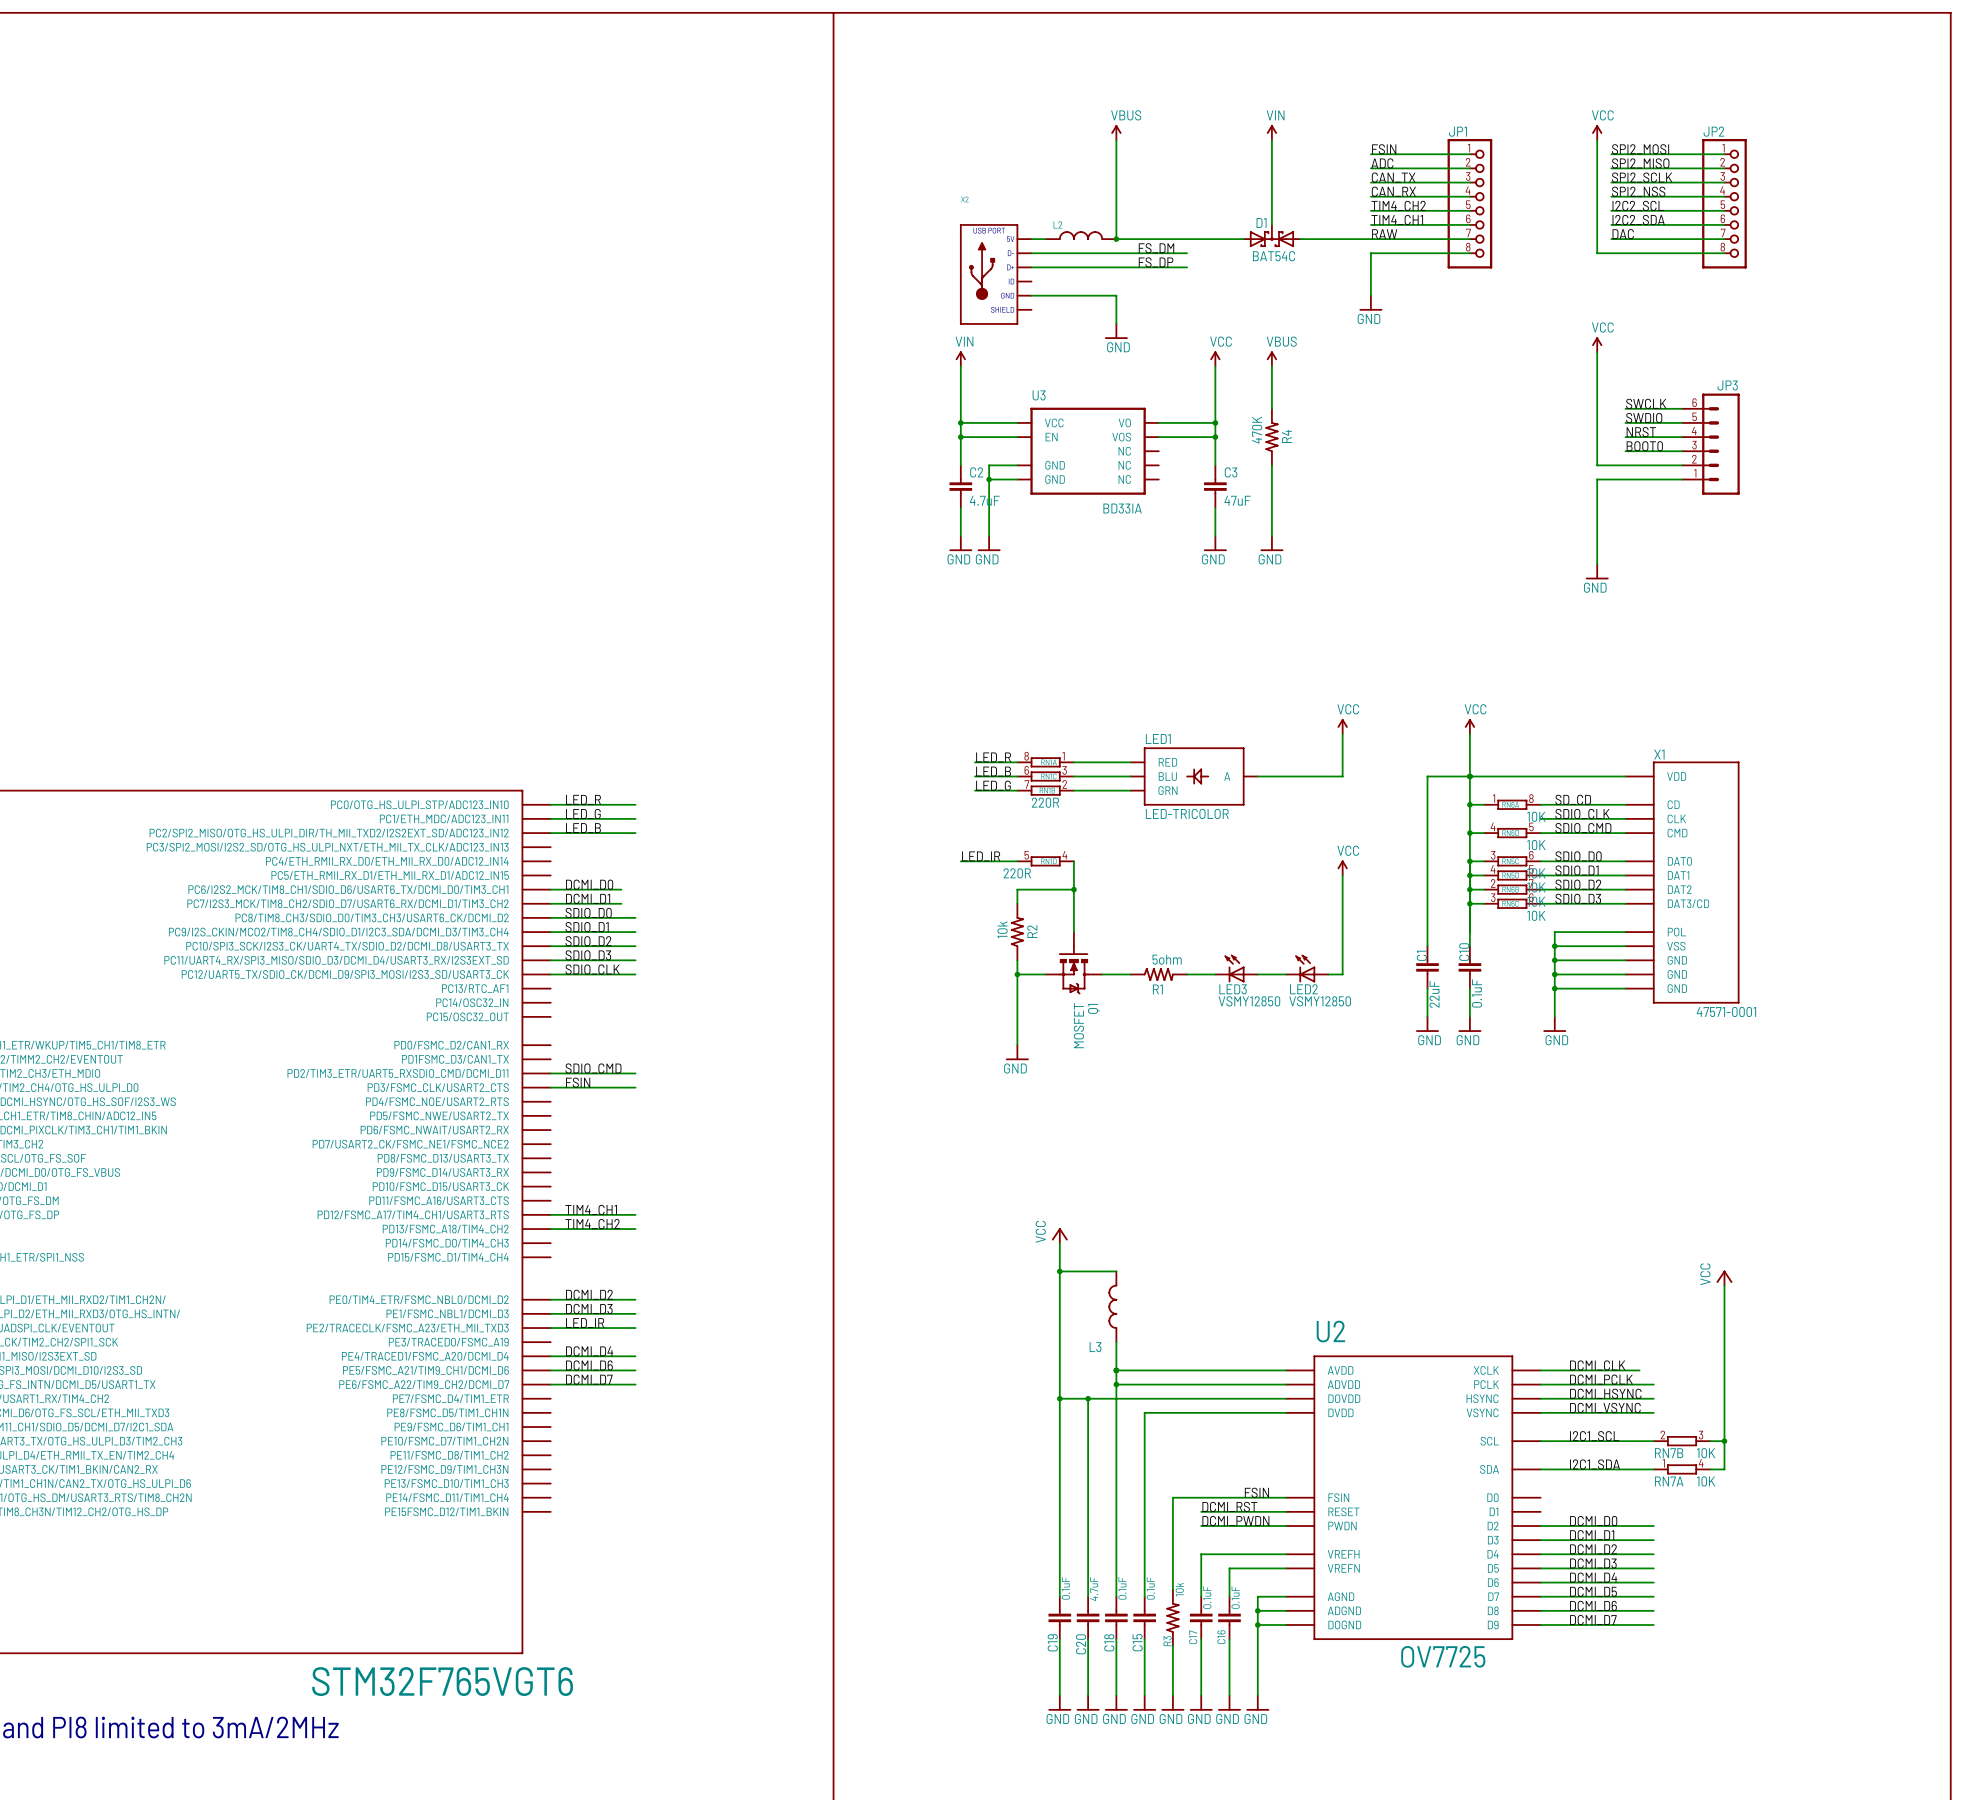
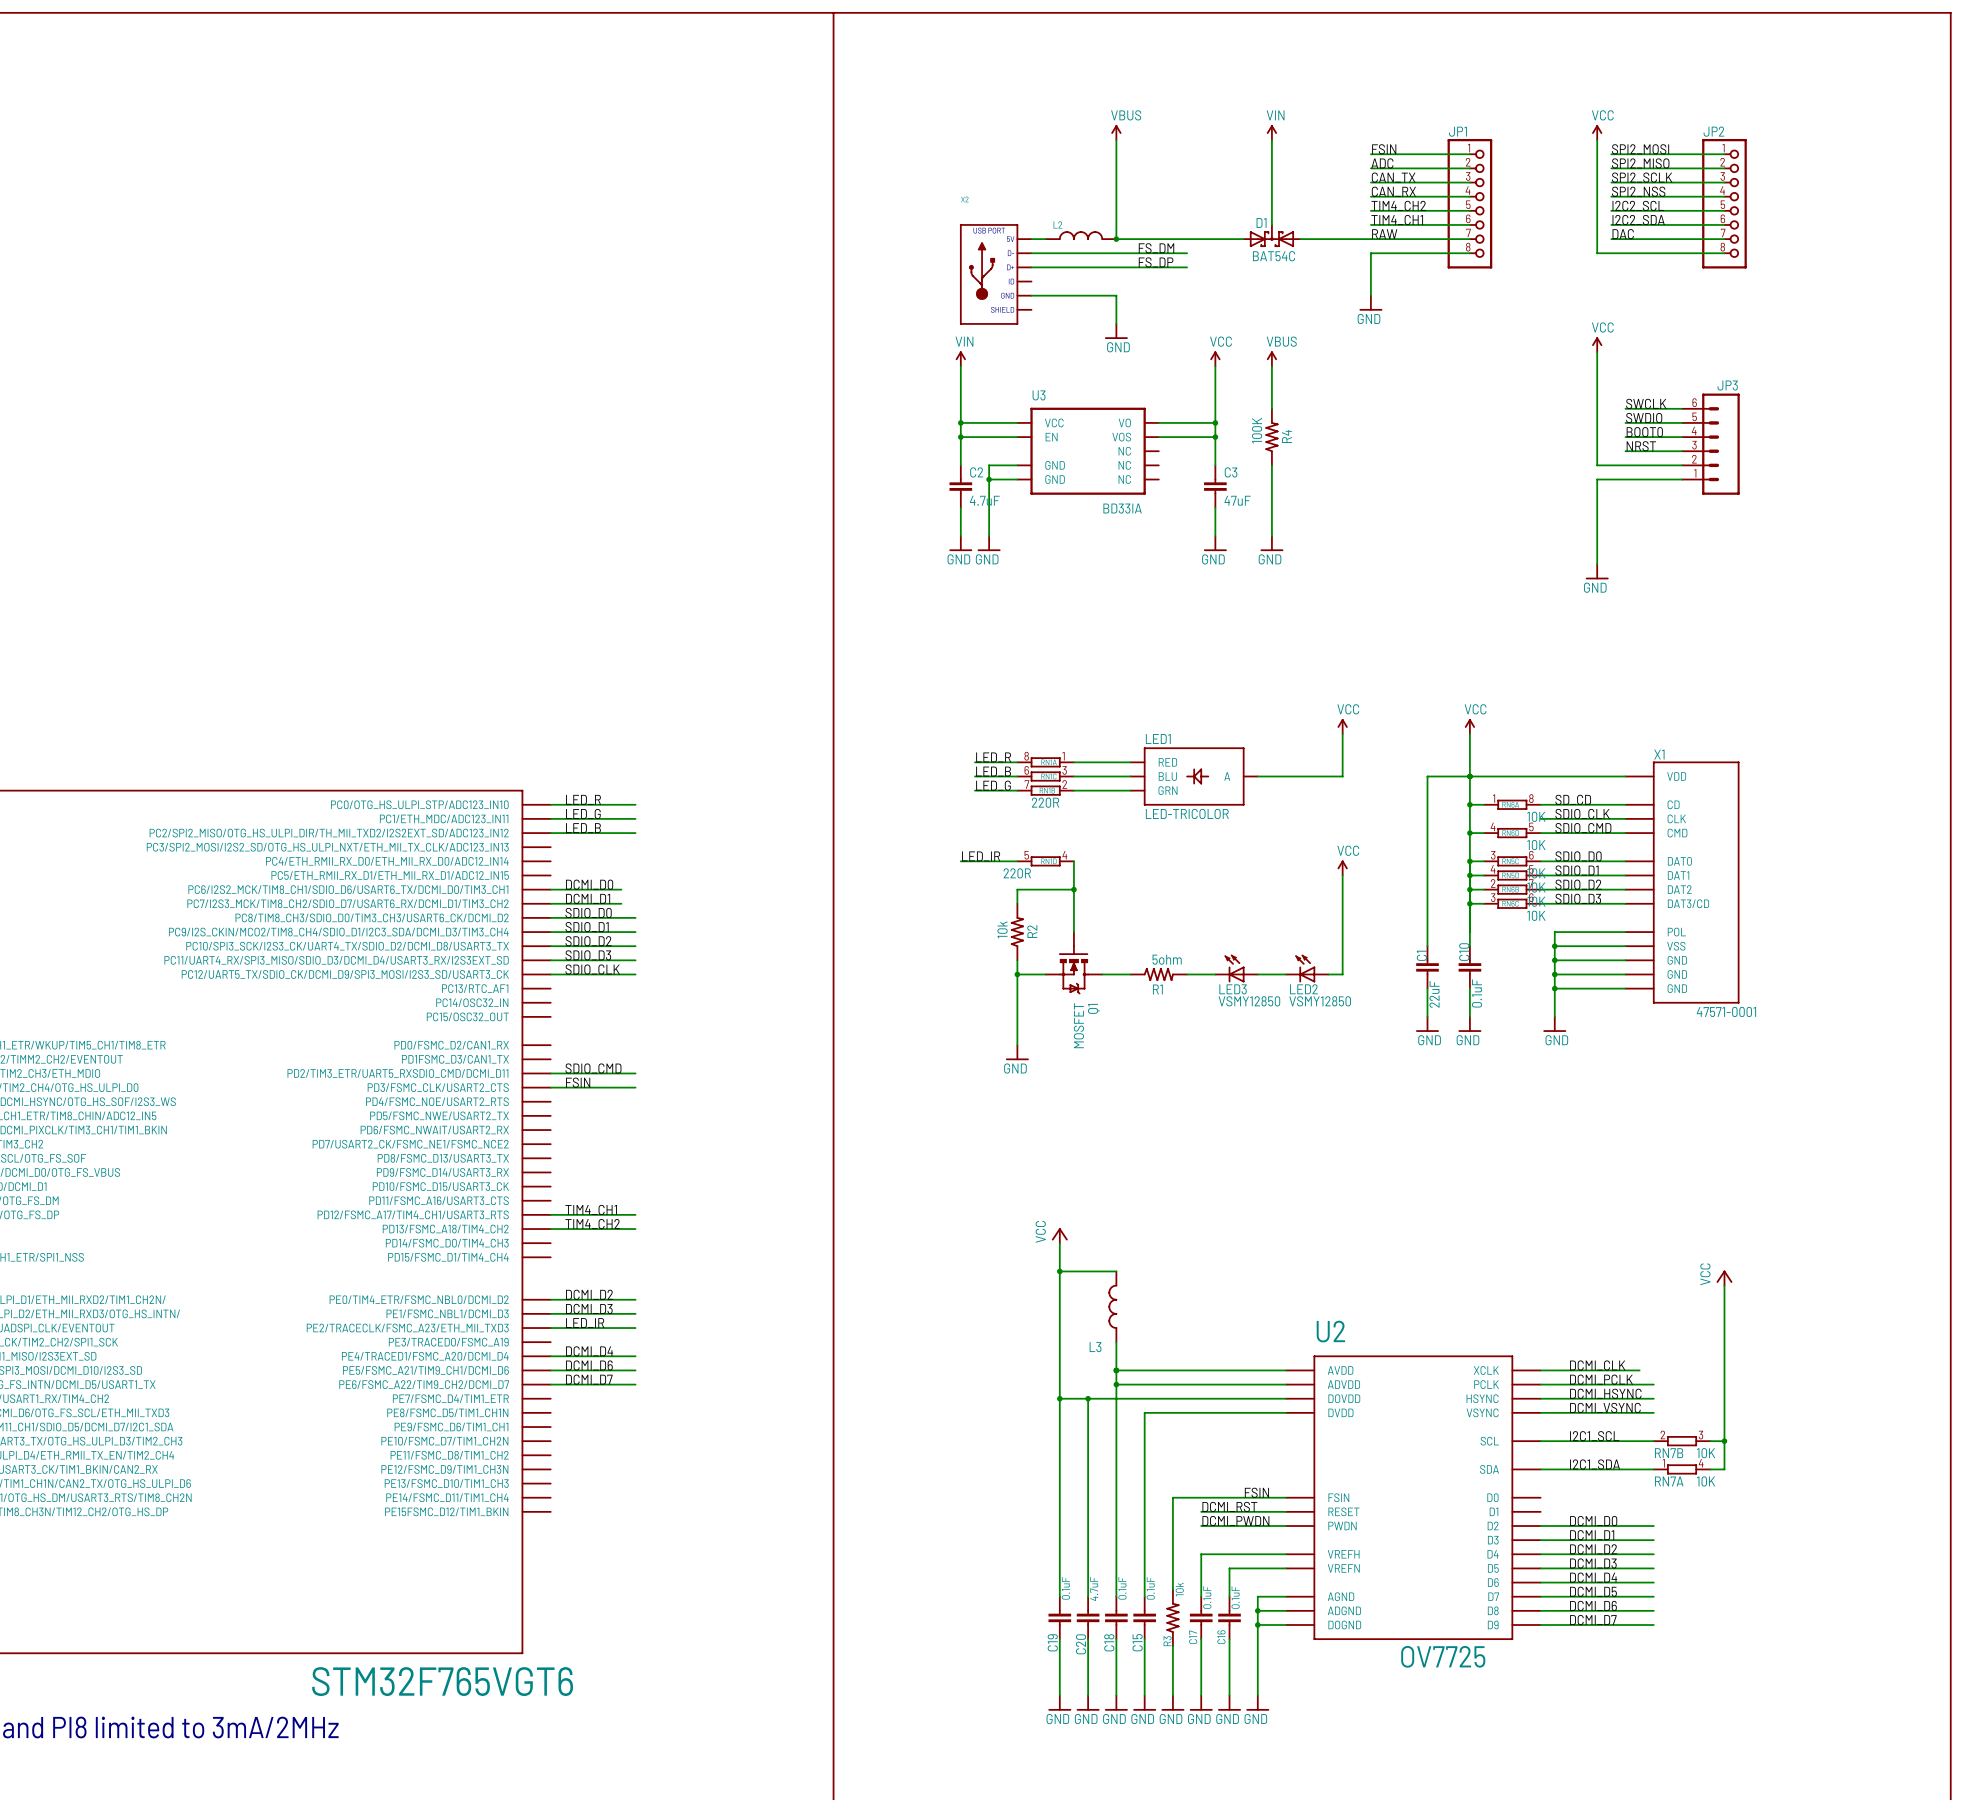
R4 value: 470K (1257, 430) -> 100K (1257, 430)
label: NRST (1641, 432) -> BOOT0 (1644, 432)
label: BOOT0 (1644, 446) -> NRST (1641, 446)

